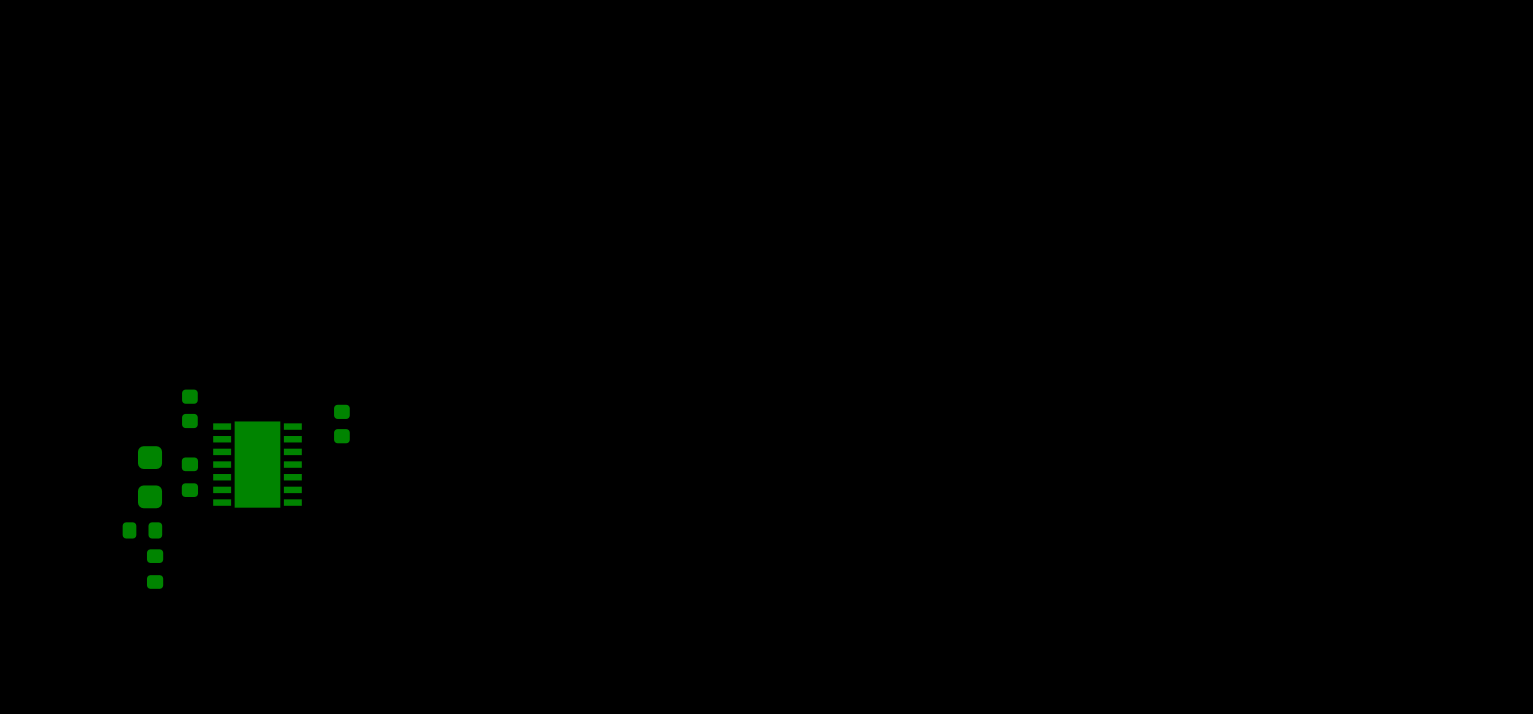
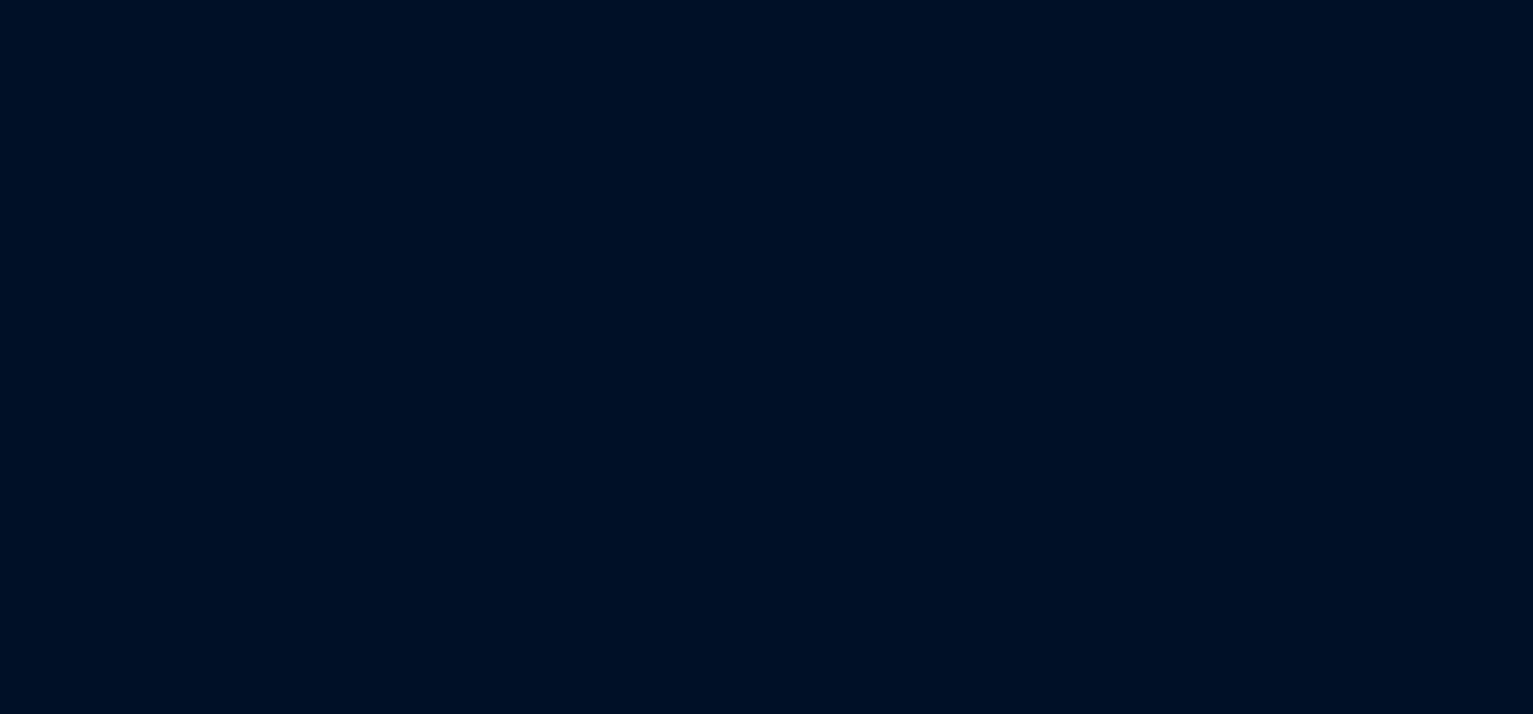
part: (189, 408) -> none
part: (341, 424) -> none
part: (257, 464) -> none
part: (150, 477) -> none
part: (189, 477) -> none
part: (142, 530) -> none
part: (155, 569) -> none

